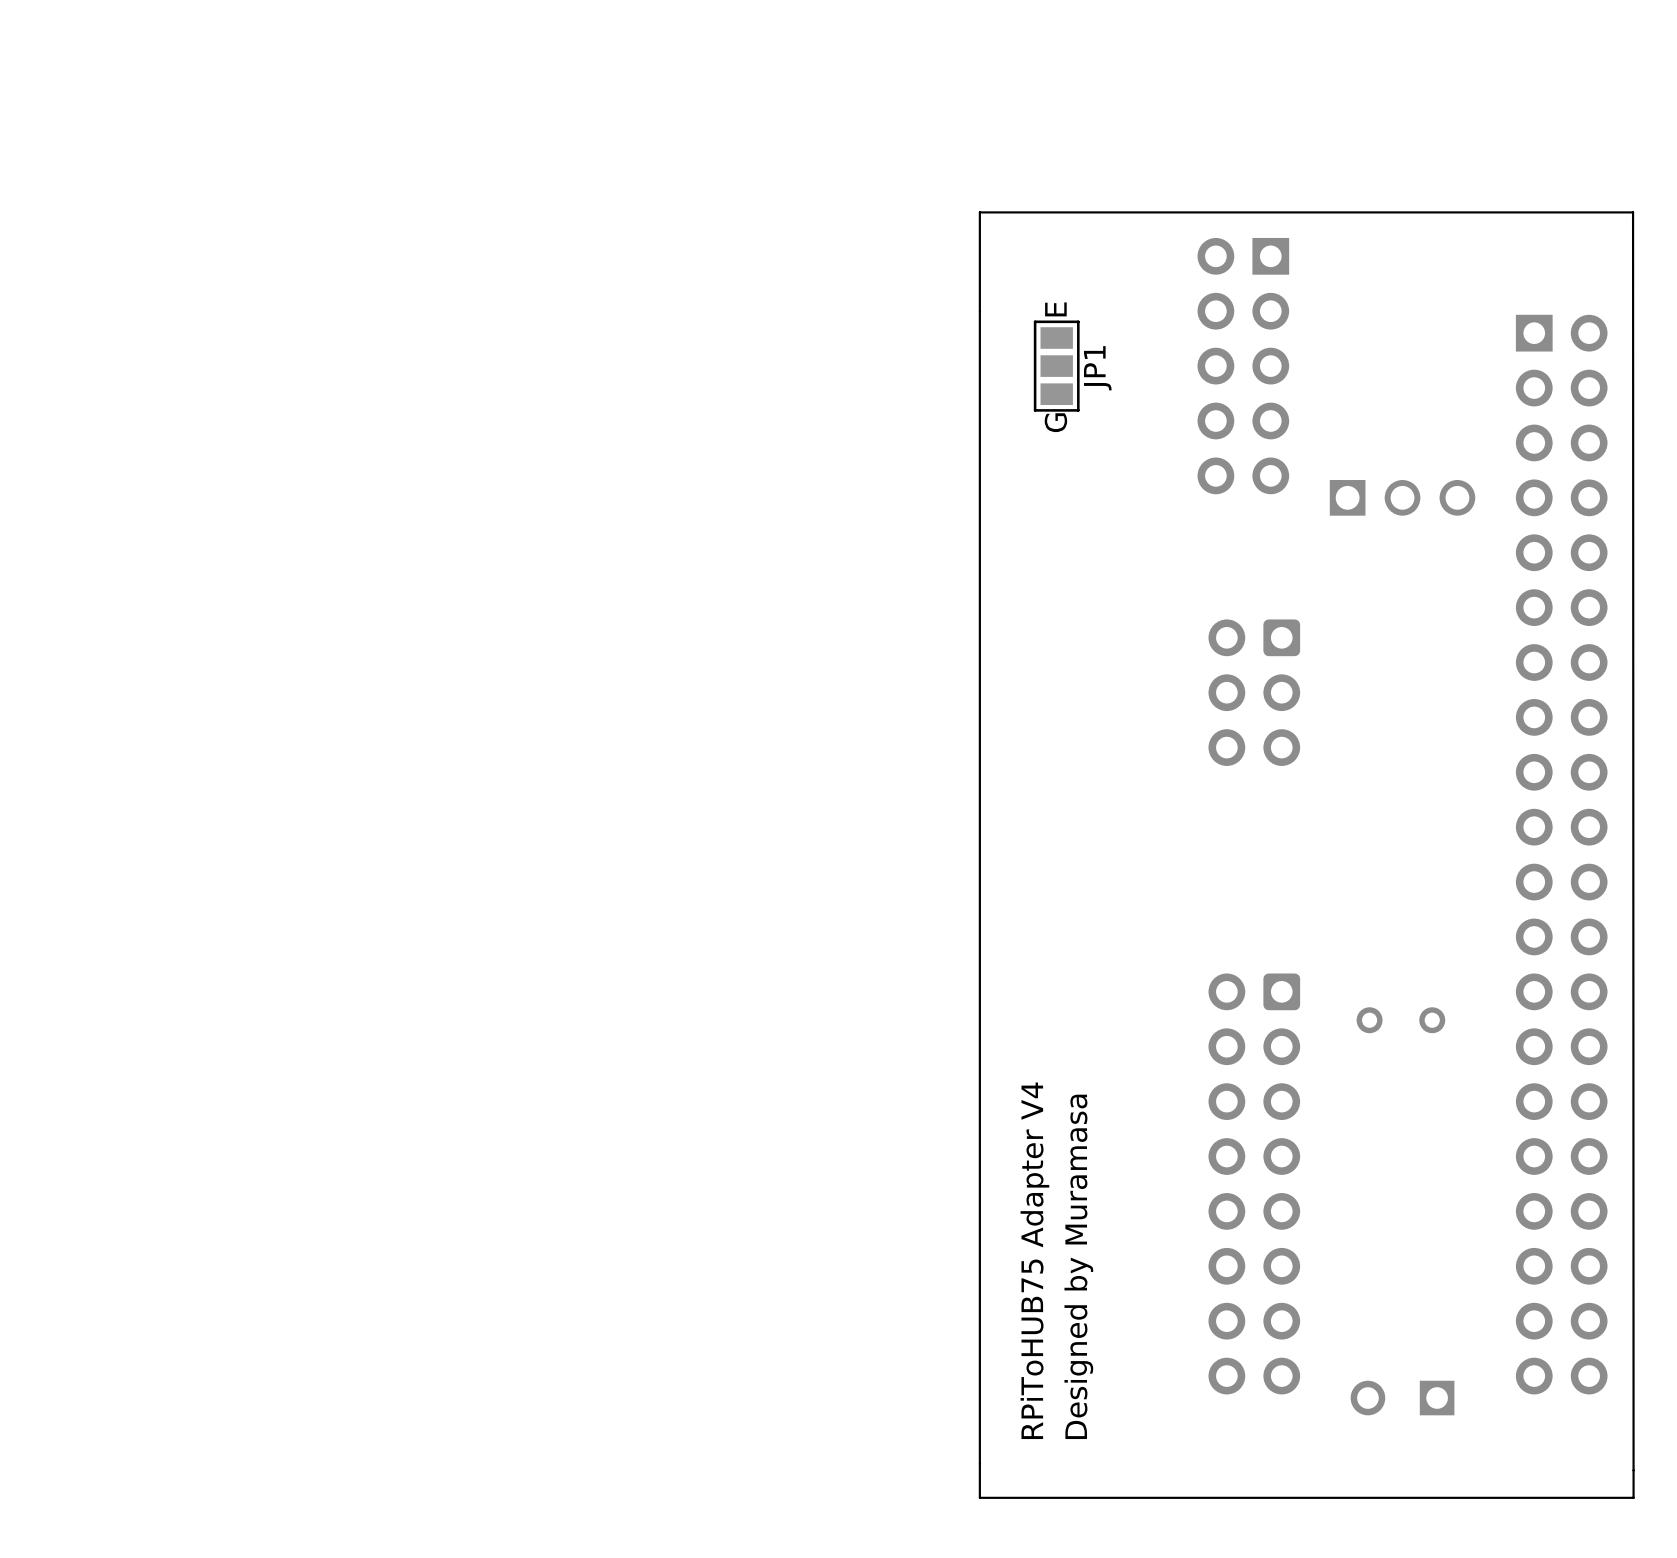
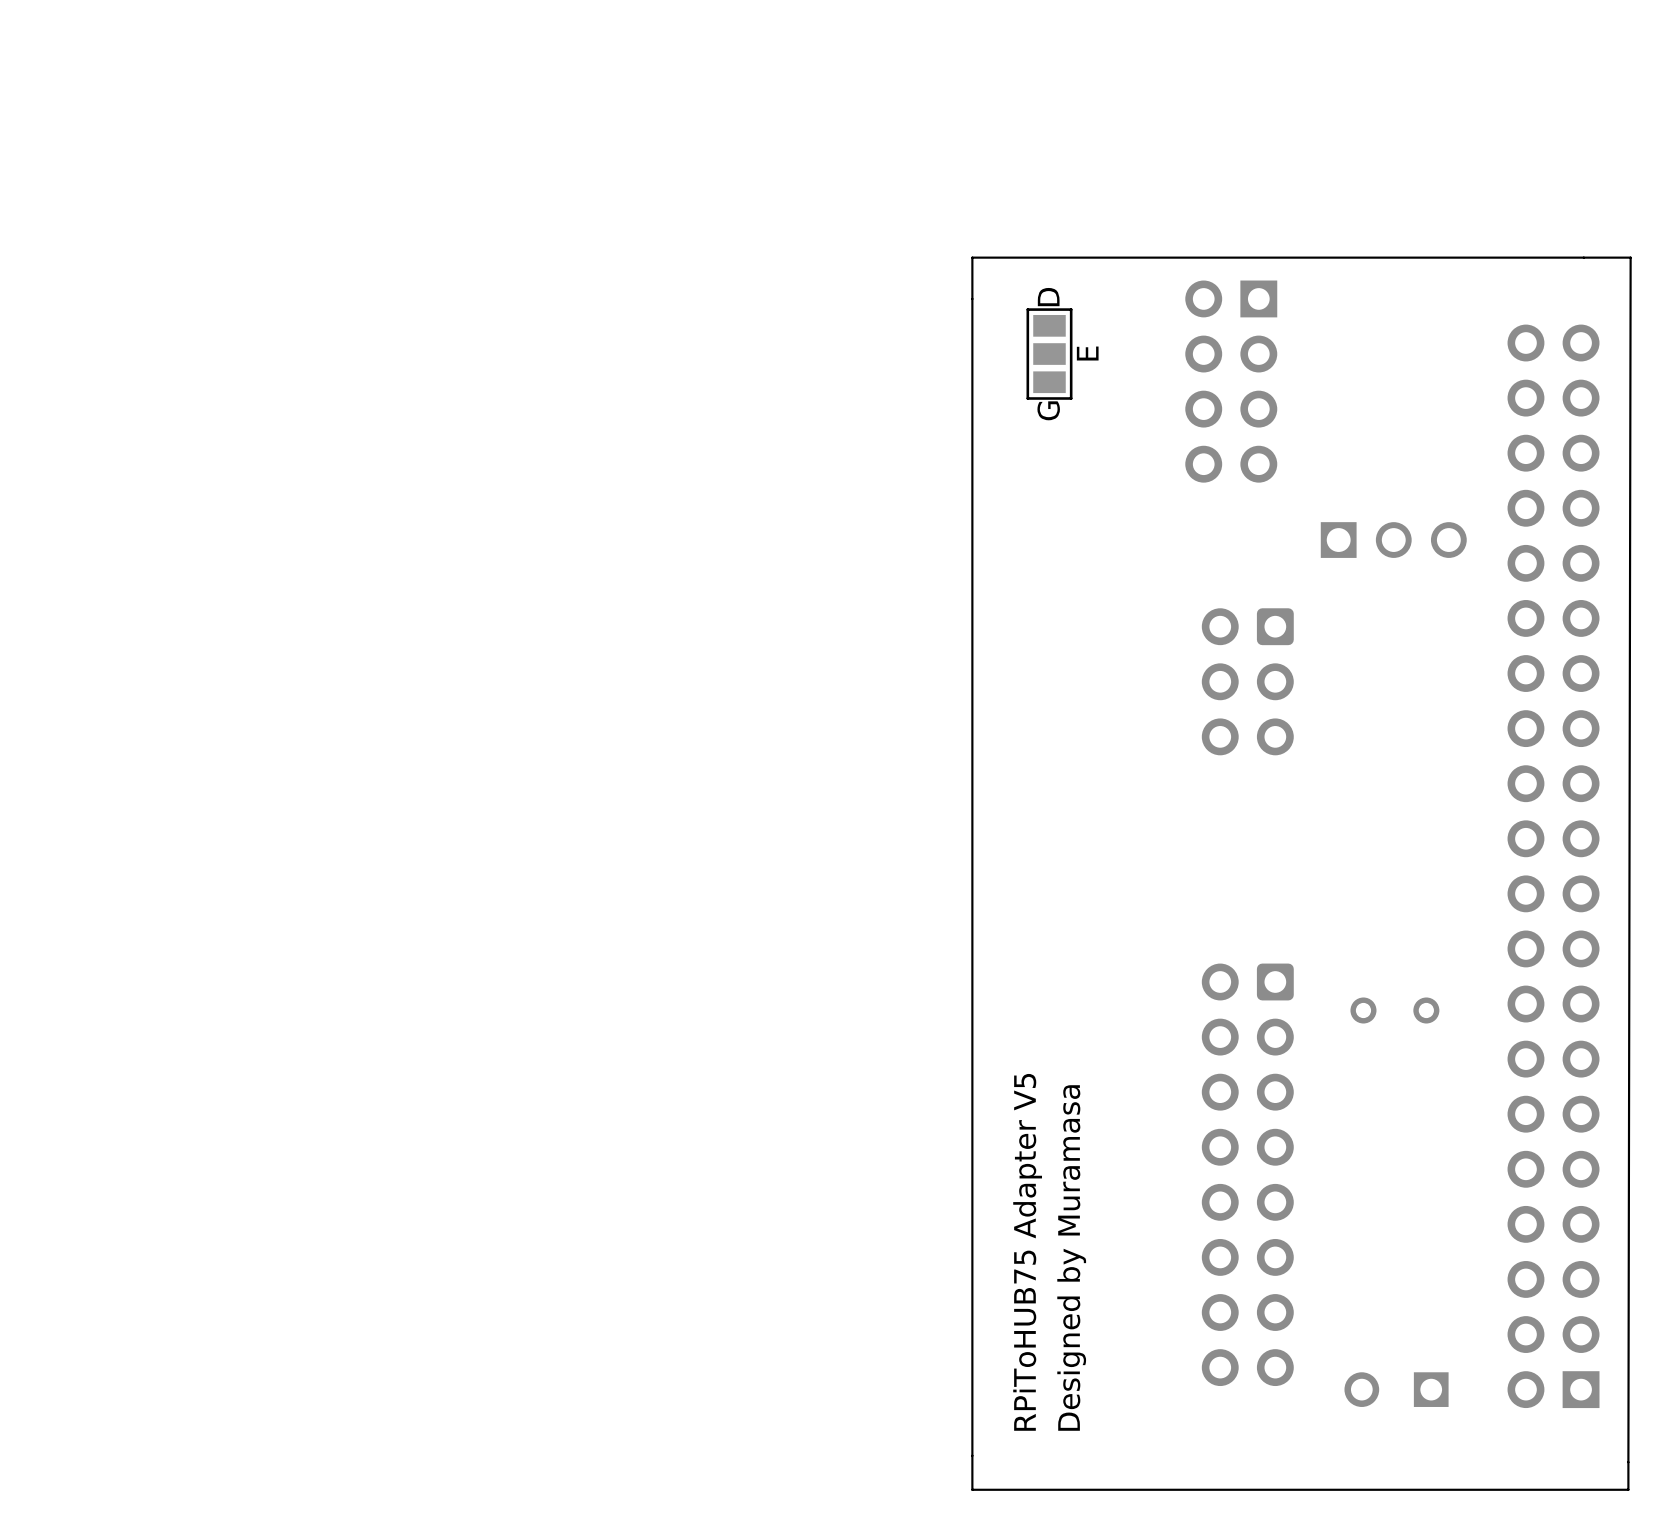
board edge: (979, 270) (979, 212) (1633, 212) (1633, 1470) -> (972, 257) (1630, 257) (1628, 1462)
JP1 text: E (1055, 309) -> D (1048, 297)
part: (1243, 366) -> none
JP1 name: JP1 (1097, 368) -> E (1087, 353)
part: none -> (1231, 381)
part position: (1402, 497) -> (1393, 540)
part rotation: 0° (1561, 854) -> 180° (1553, 866)
text: RPiToHUB75 Adapter V4 (1034, 1260) -> RPiToHUB75 Adapter V5 (1027, 1252)

